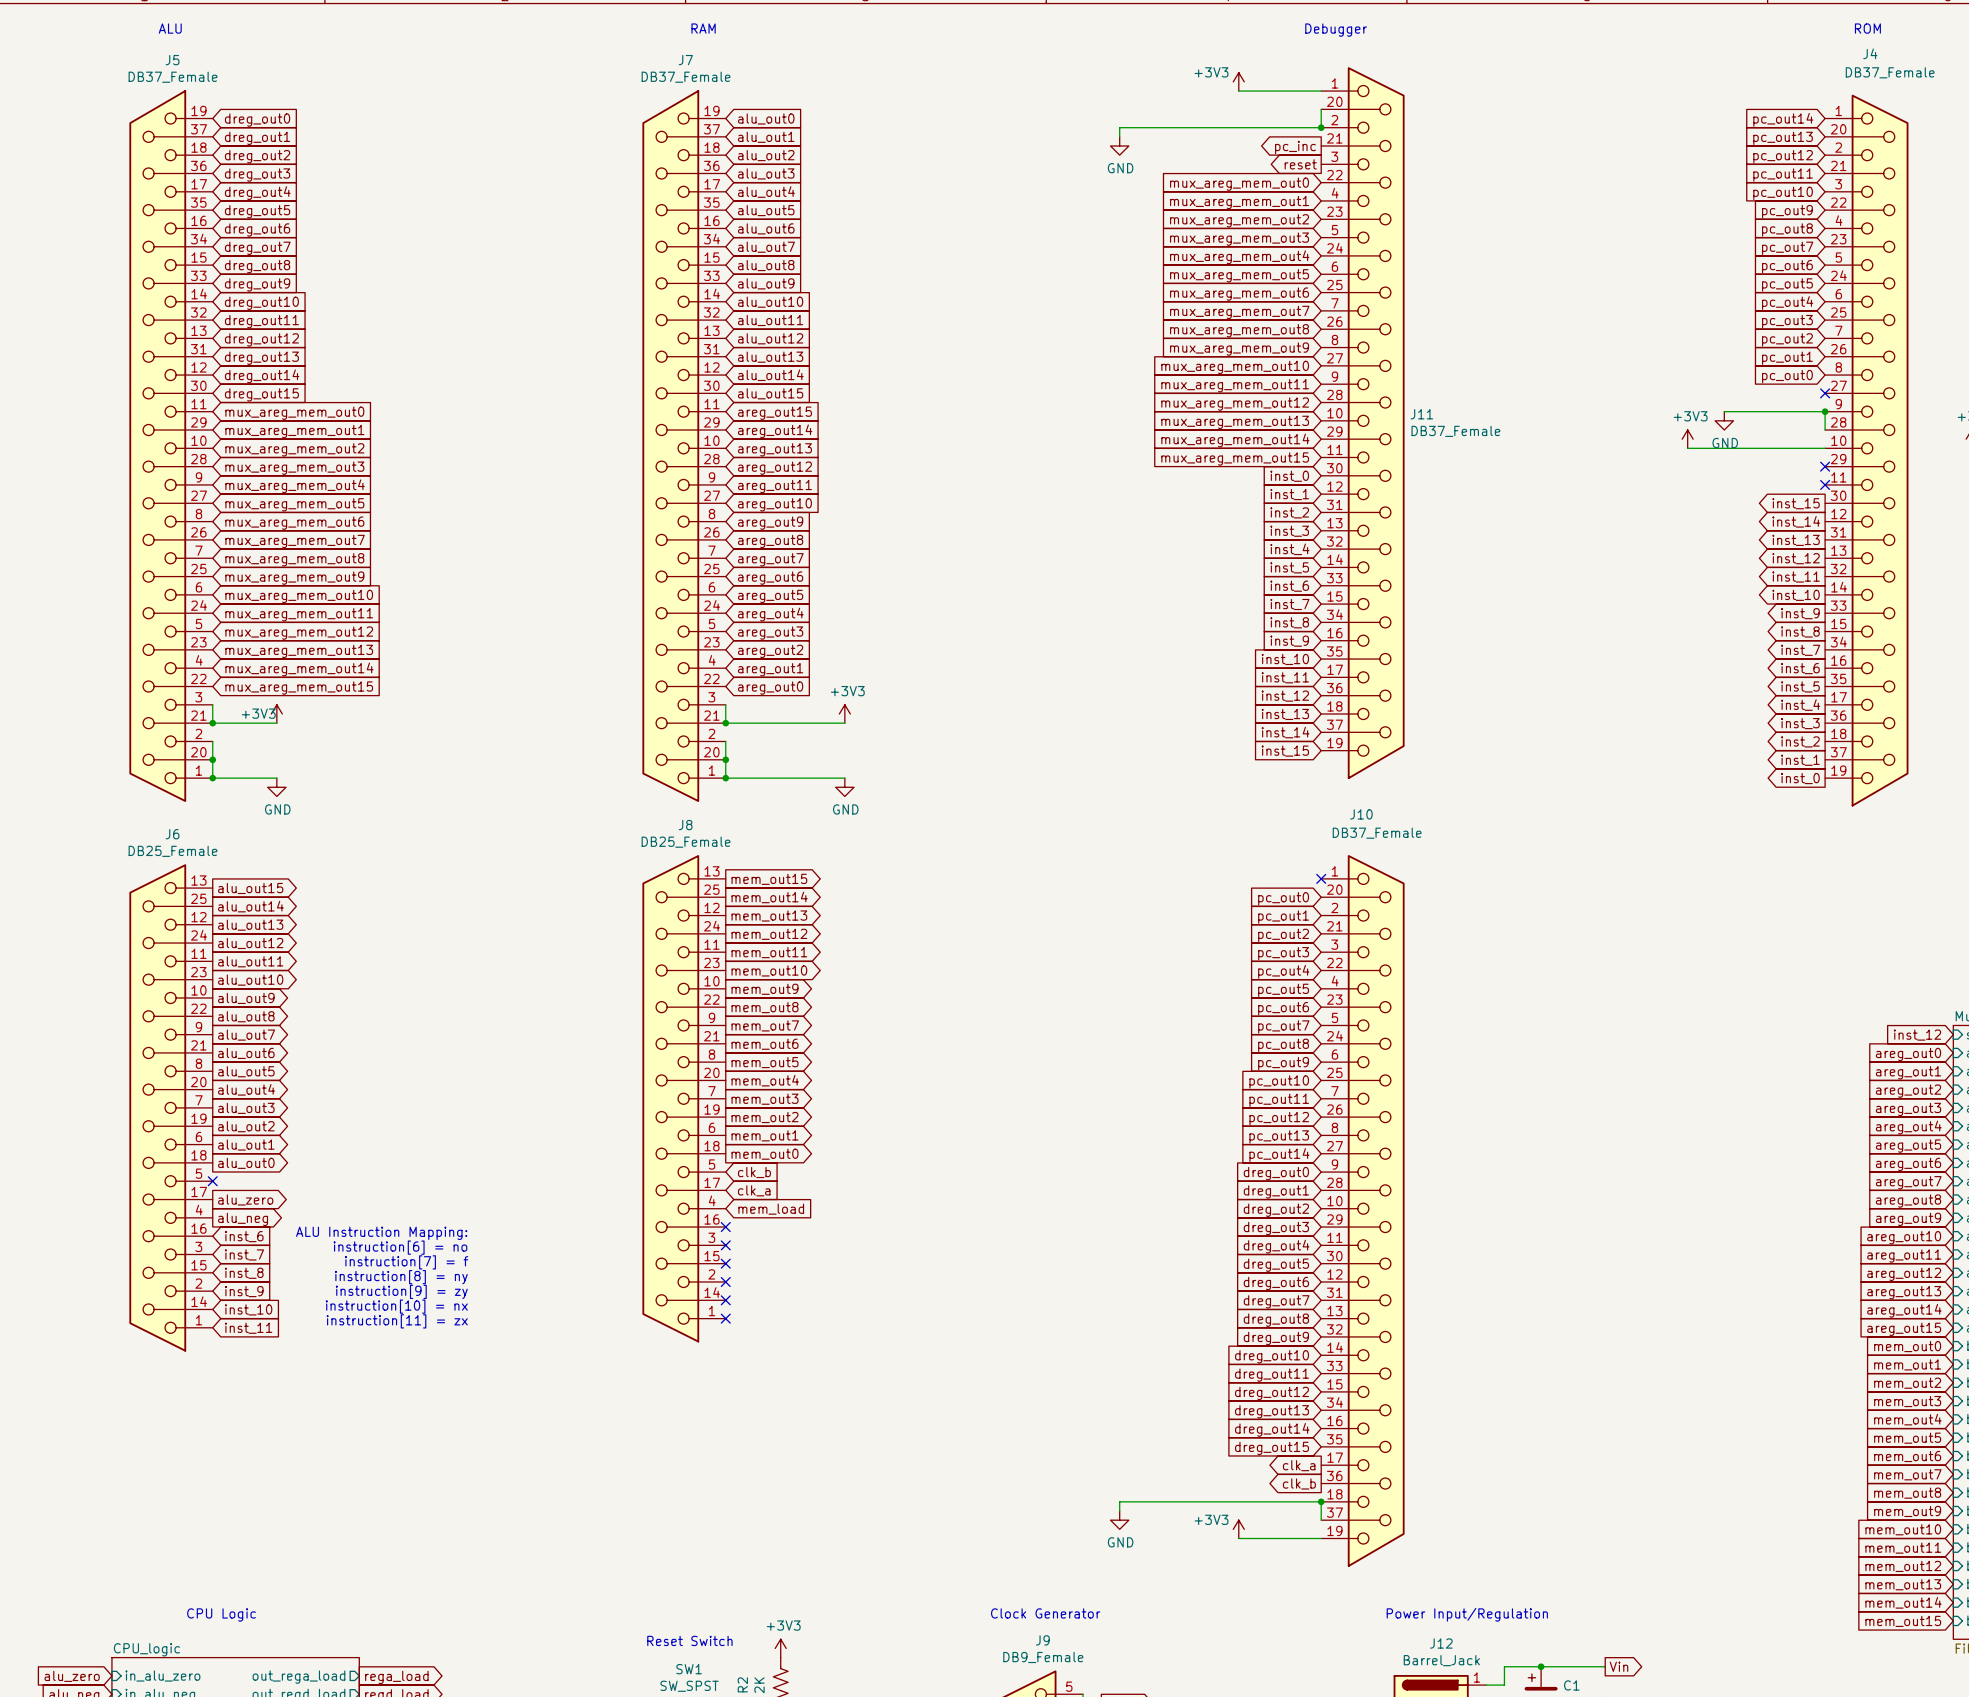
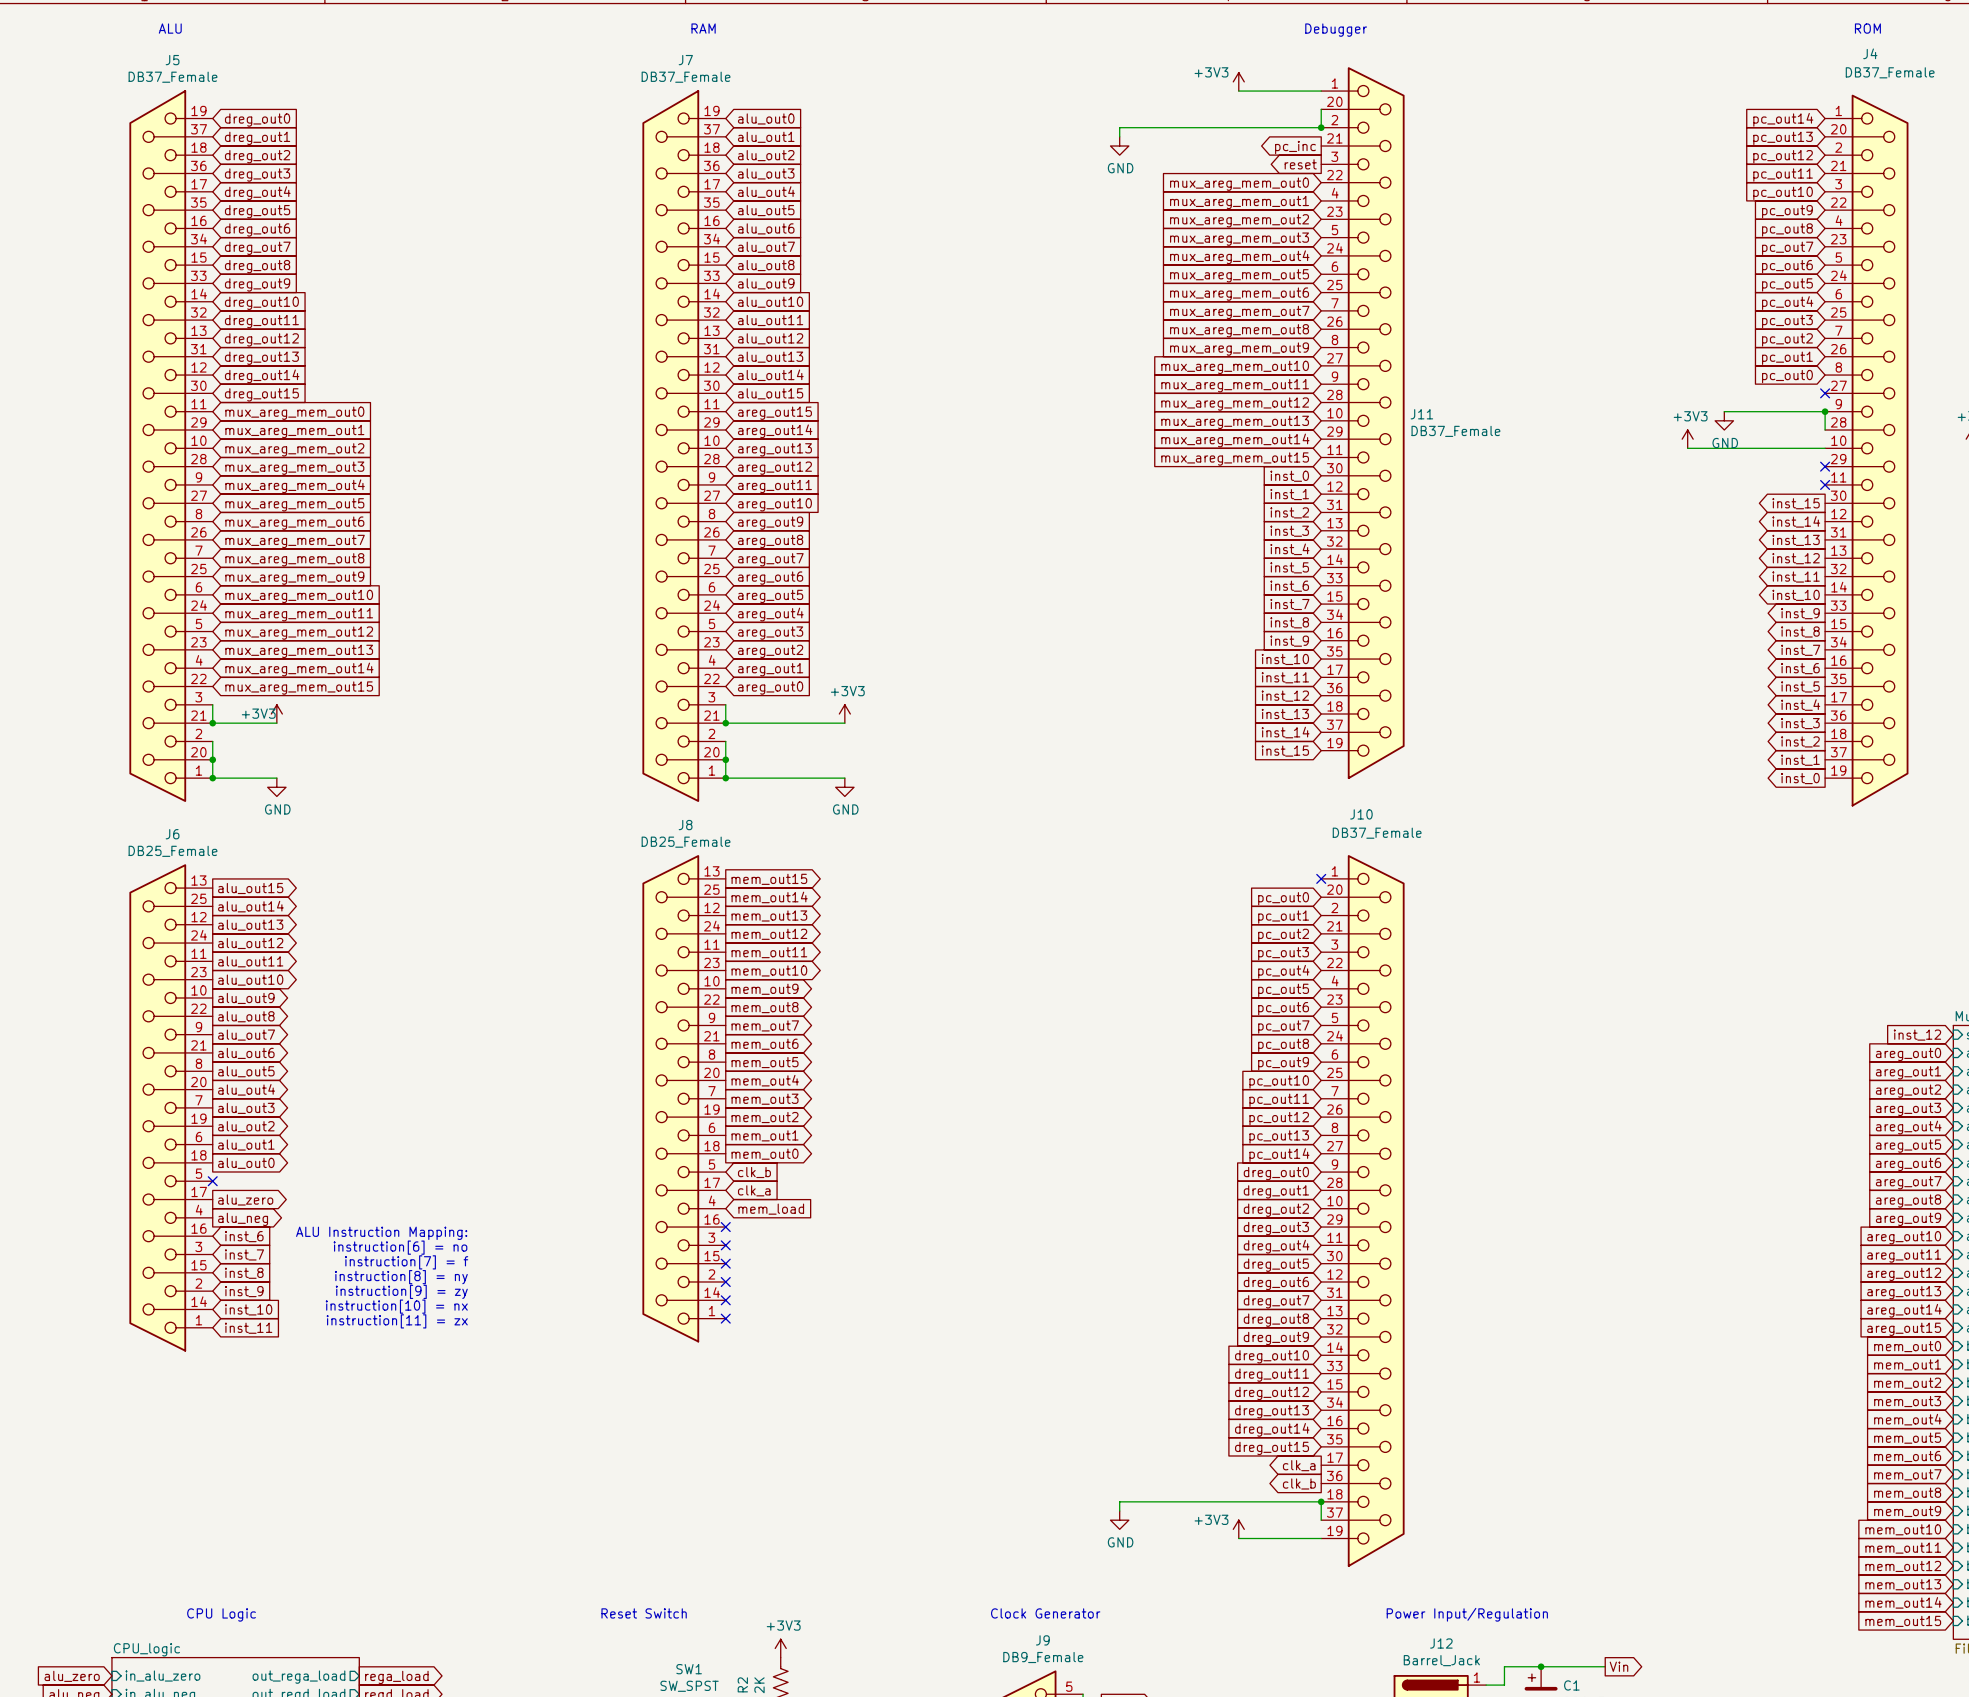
text position: Reset Switch (689, 1640) -> Reset Switch (644, 1613)

